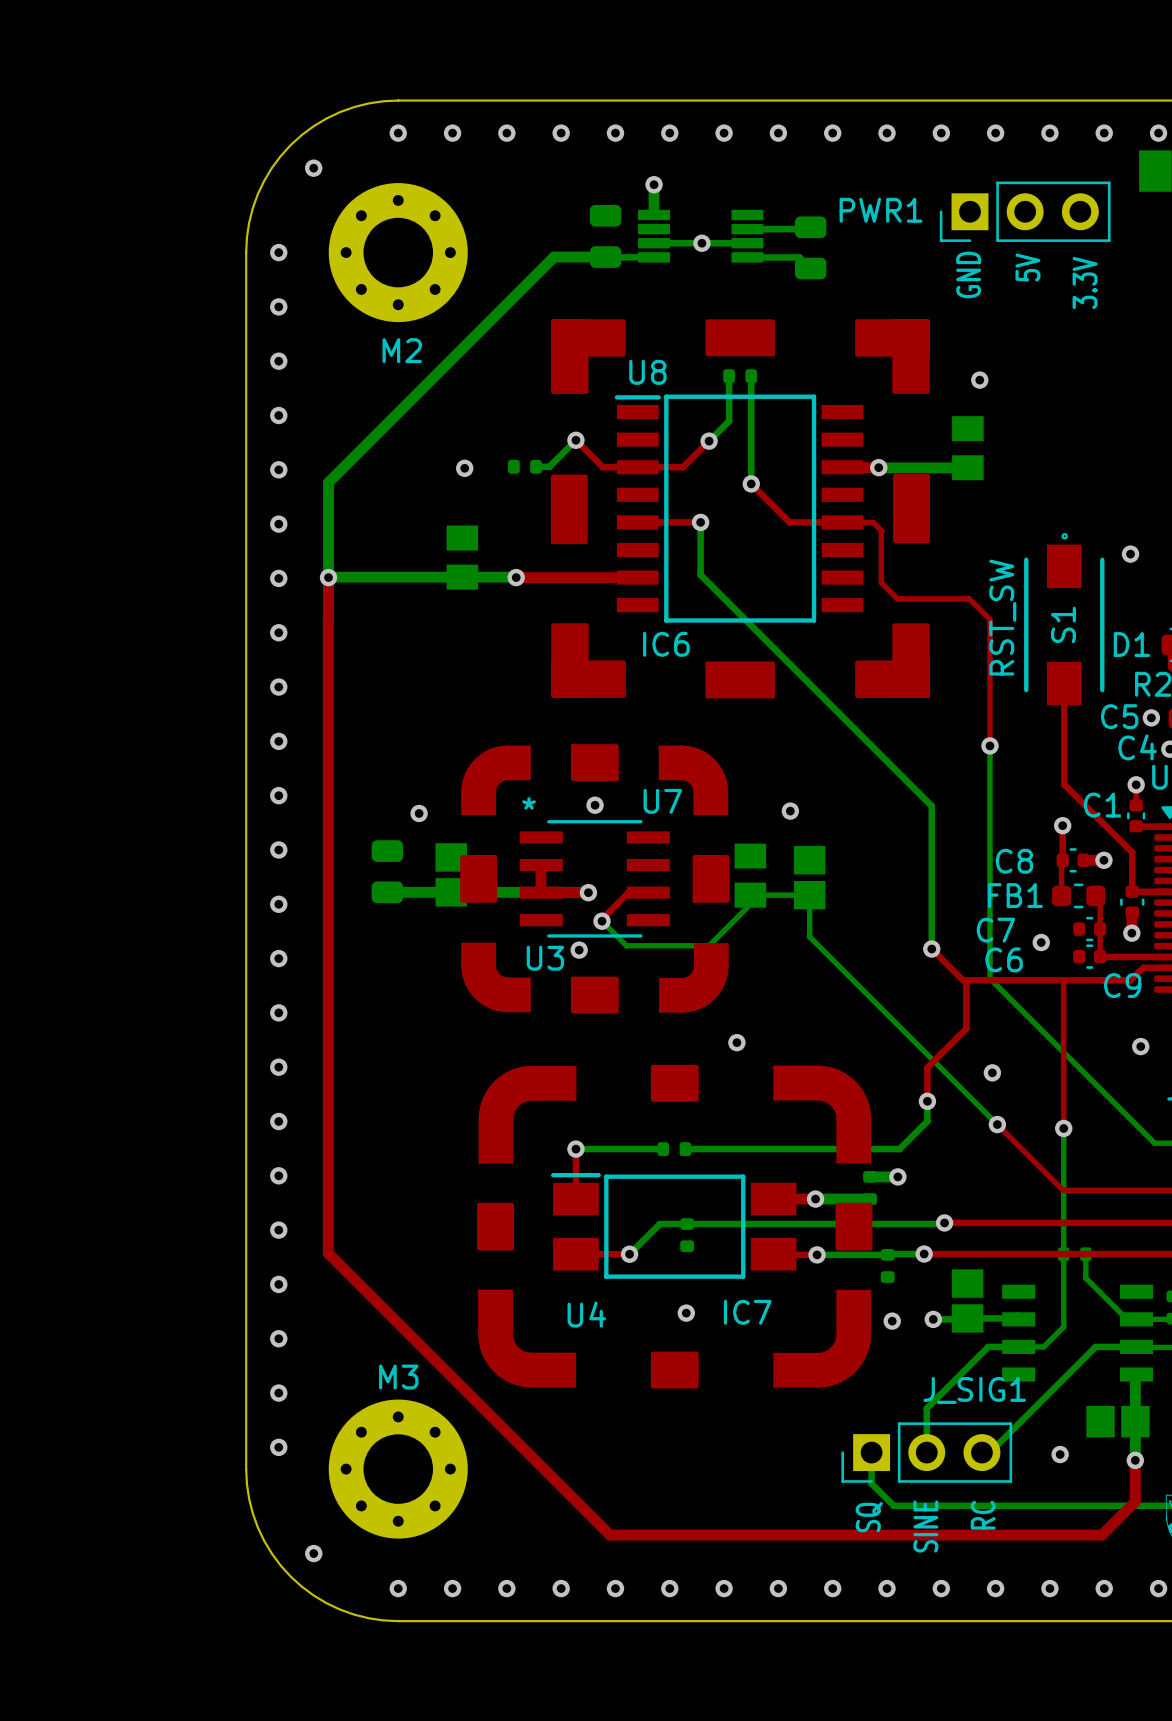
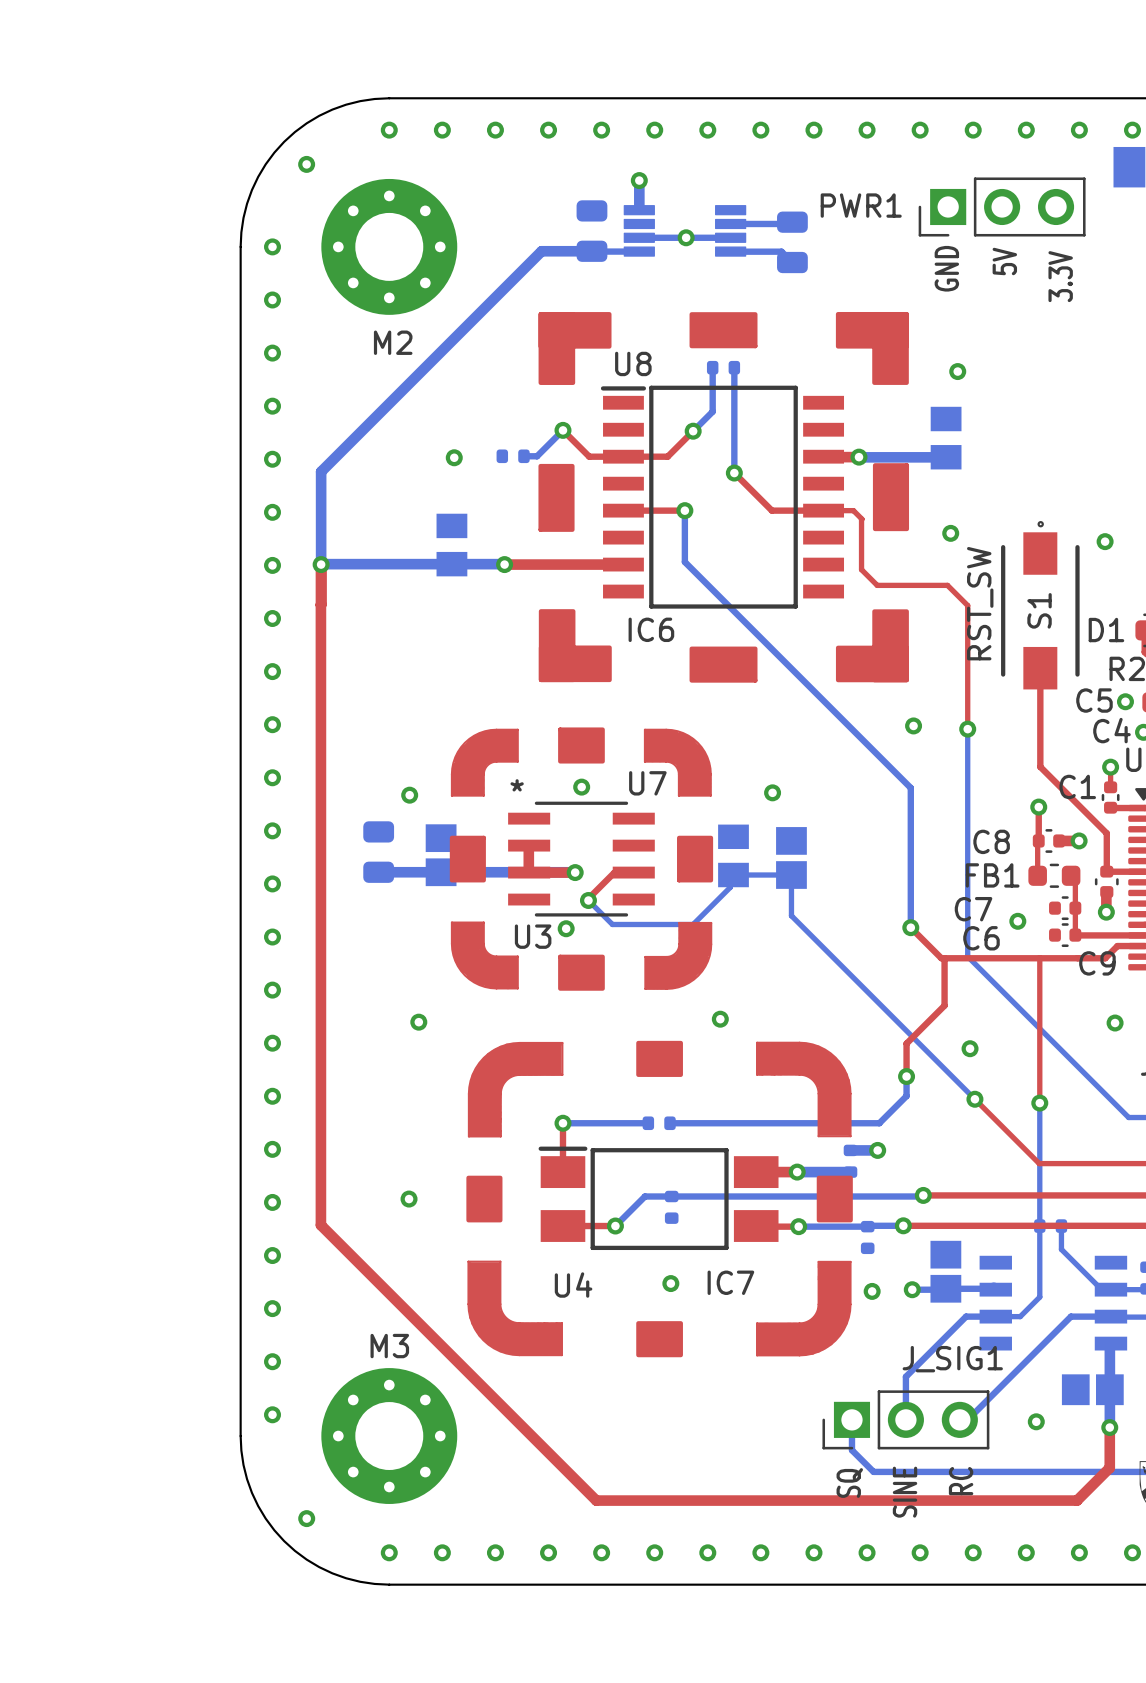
via: none -> (950, 533)
via: none -> (913, 725)
via: none -> (418, 1022)
via: none -> (409, 1199)

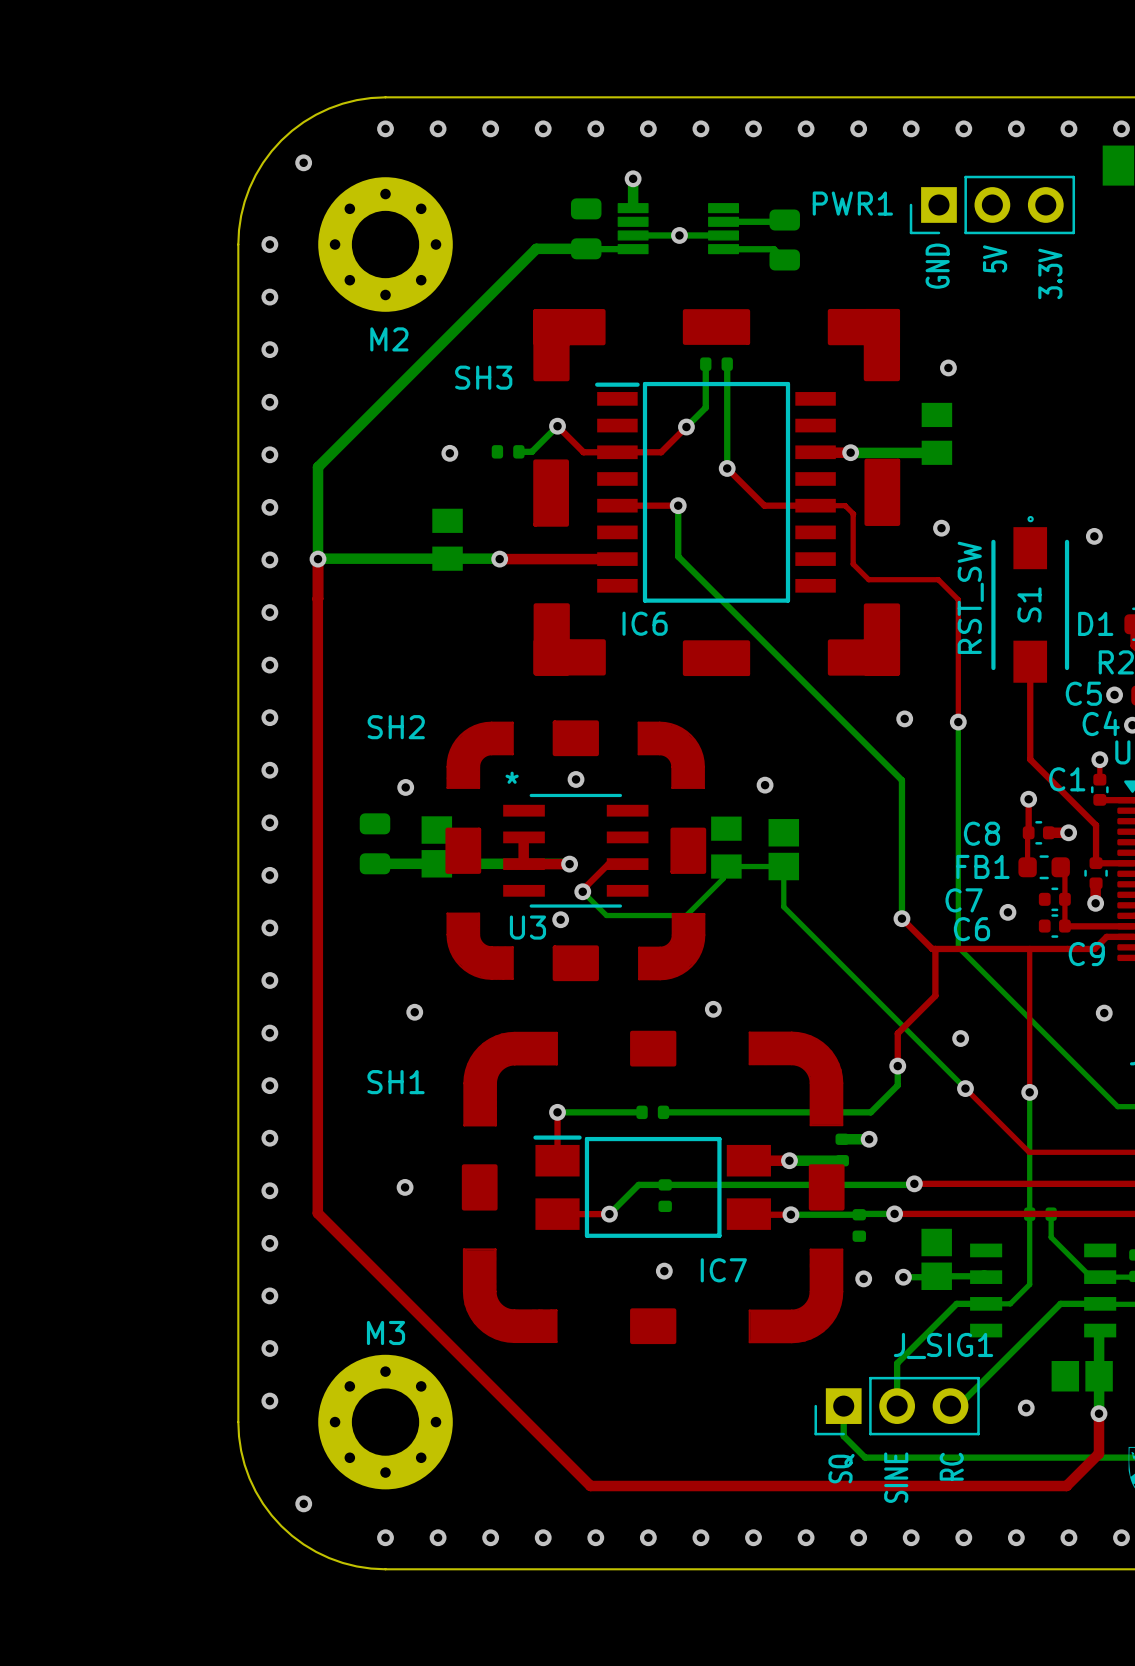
U8 name: U8 (633, 363) -> SH3 (483, 377)
U7 name: U7 (647, 783) -> SH2 (396, 727)
U4 name: U4 (573, 1285) -> SH1 (396, 1082)

